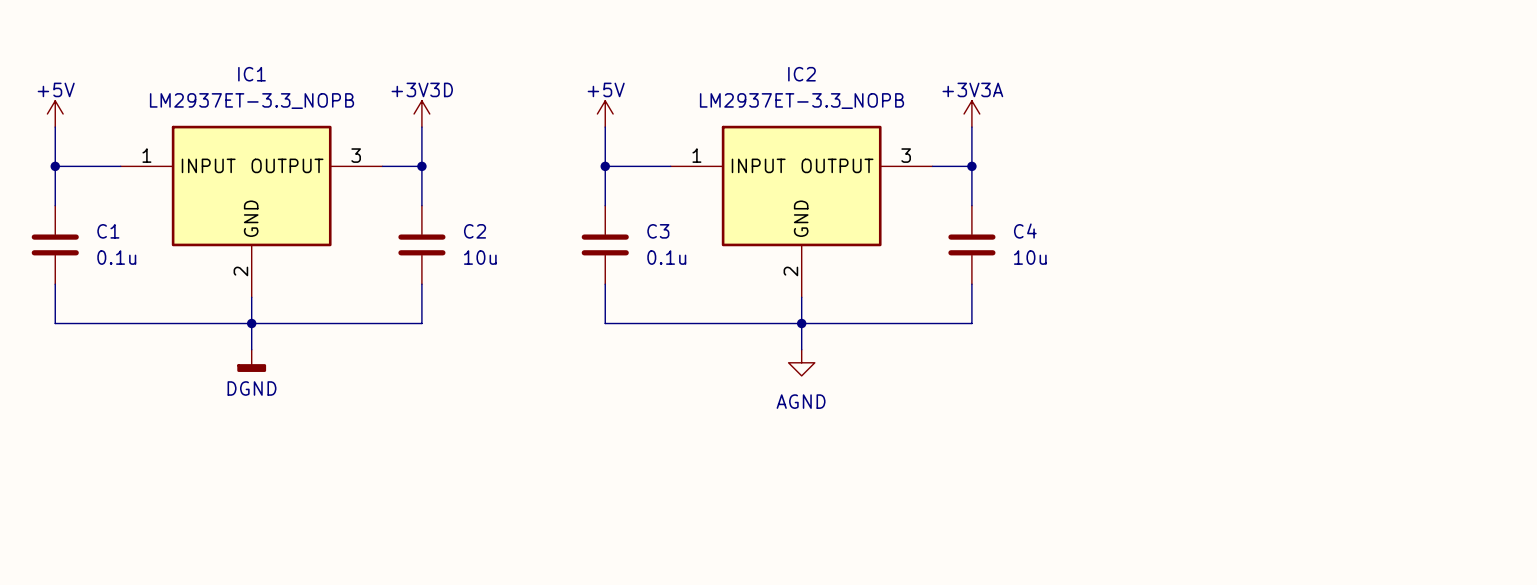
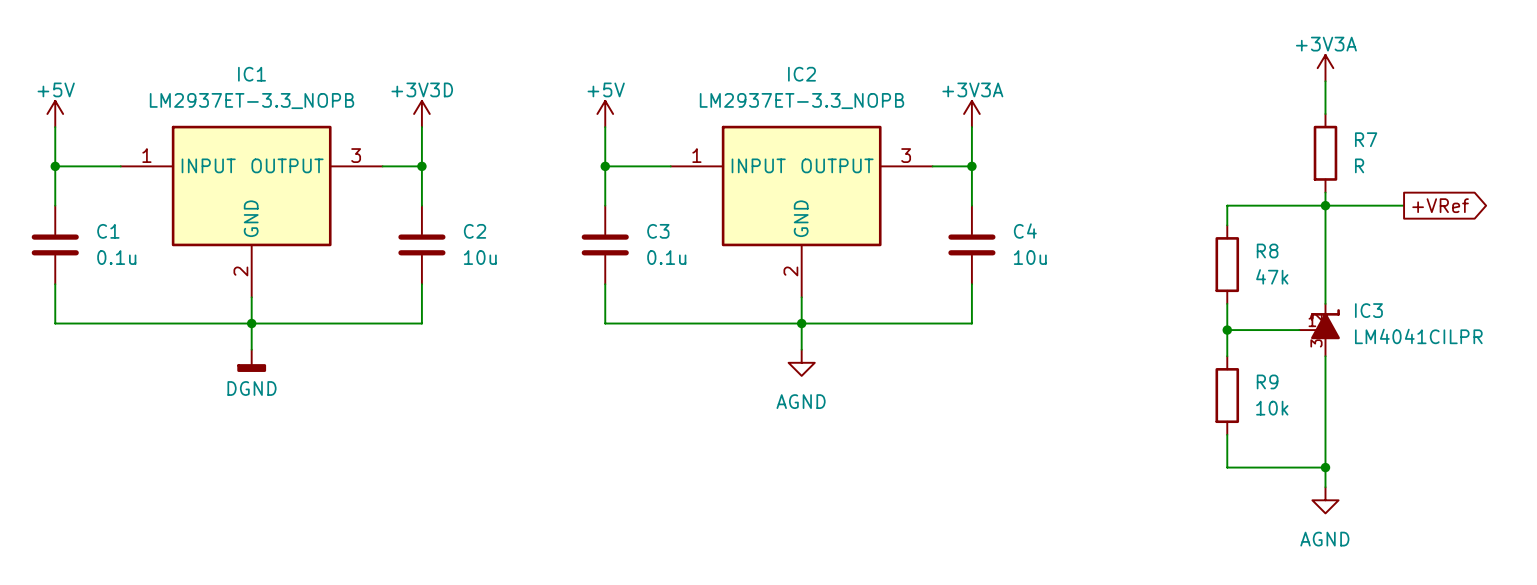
power symbol: none -> +3V3A (1325, 68)
wire: none -> (1325, 81) (1325, 113)
R7: none -> R (1325, 153)
wire: none -> (1325, 192) (1325, 303)
junction: none -> (1325, 205)
wire: none -> (1404, 205) (1227, 205) (1227, 225)
global label: none -> +VRef (1440, 205)
R8: none -> 47k (1227, 264)
wire: none -> (1227, 303) (1227, 356)
wire: none -> (1227, 330) (1299, 330)
junction: none -> (1227, 330)
IC3: none -> LM4041CILPR (1319, 330)
wire: none -> (1325, 356) (1325, 487)
R9: none -> 10k (1227, 395)
wire: none -> (1227, 434) (1227, 467) (1325, 467)
junction: none -> (1325, 467)
power symbol: none -> AGND (1325, 500)

